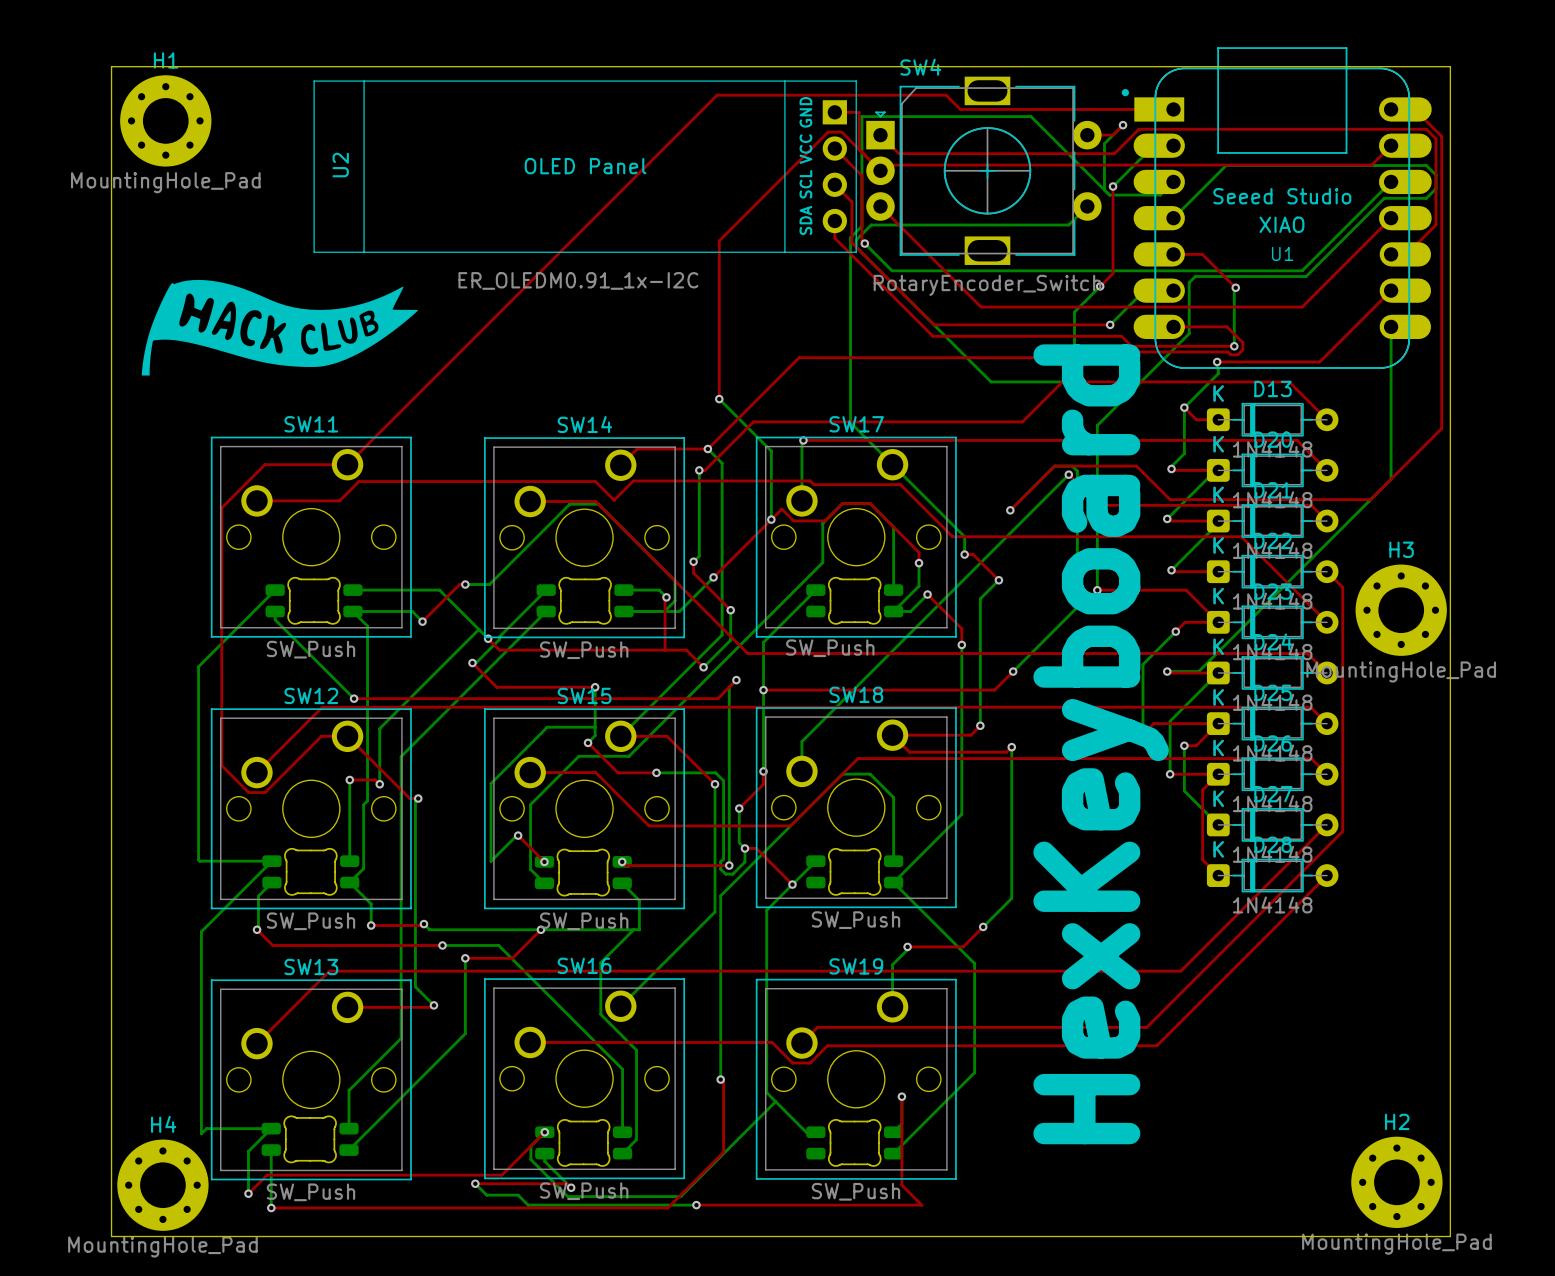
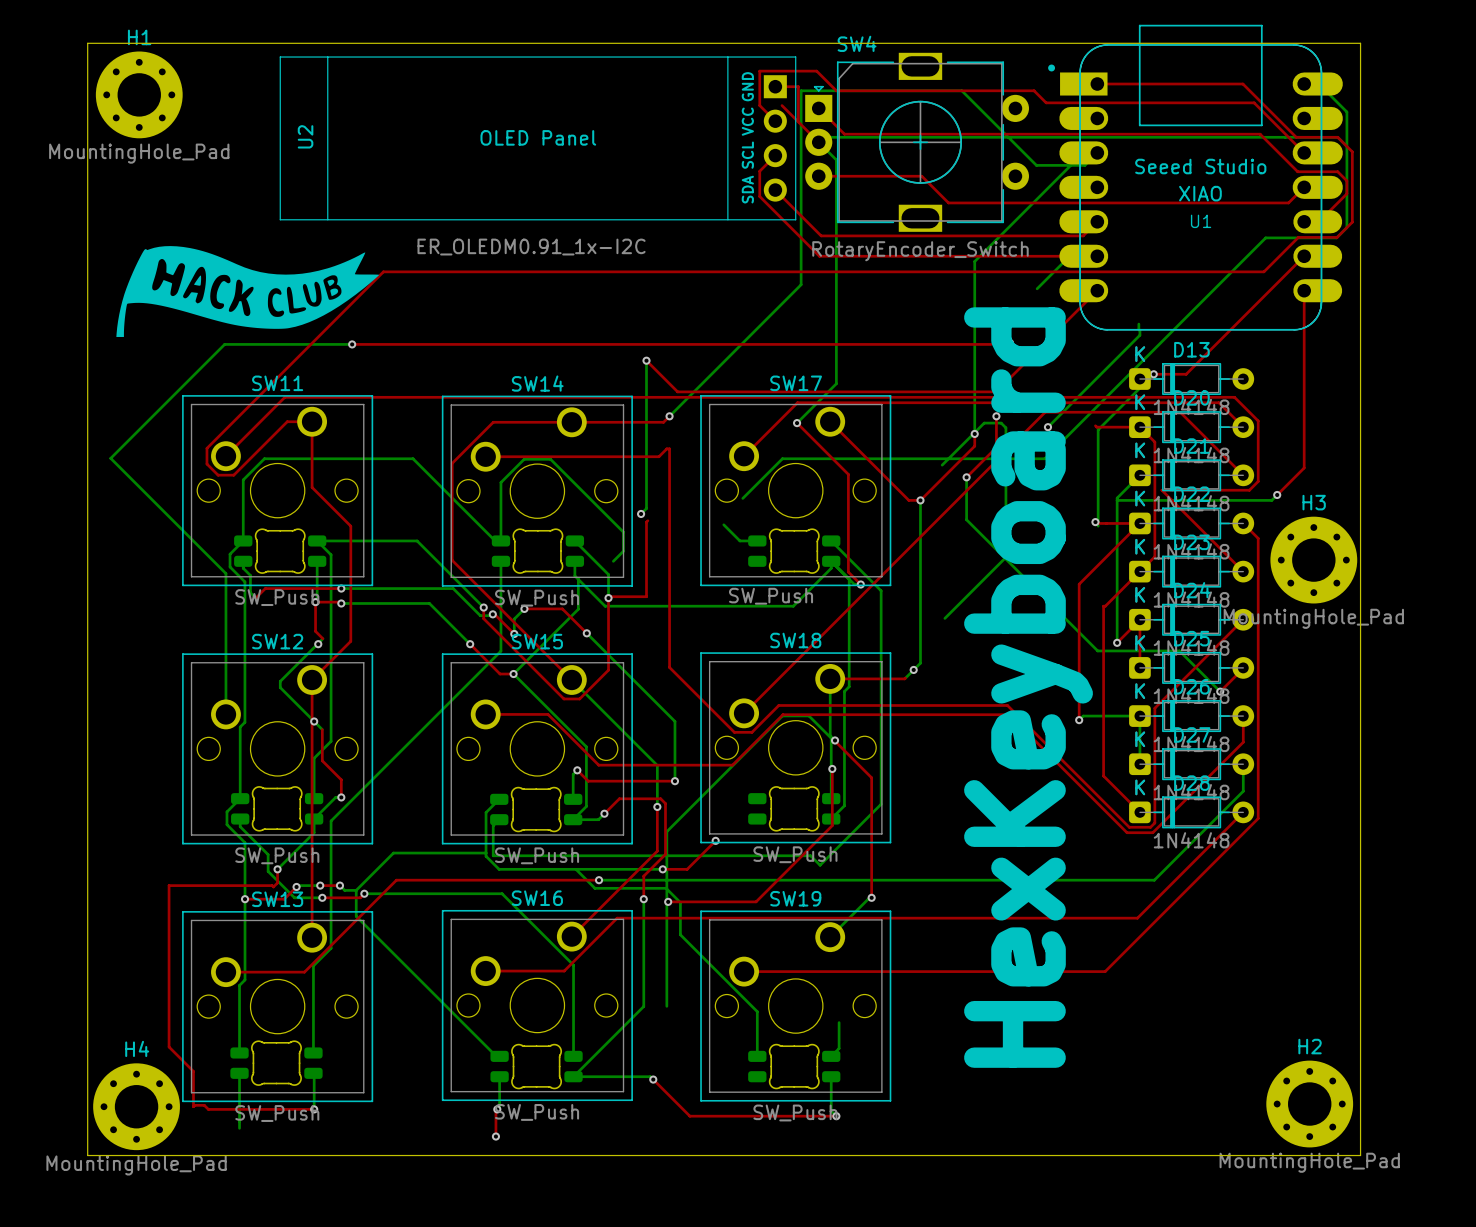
top track: (1173, 109) (960, 109) (946, 95) (717, 95) (347, 464) -> none
top track: (1391, 109) (1414, 109) (1441, 136) (1441, 180) -> (1097, 84) (1242, 84) (1296, 137) (1337, 137) (1352, 151)
bottom track: none -> (1304, 84) (1318, 84) (1346, 111) (1346, 146)
top track: (1123, 125) (1113, 135) (1087, 135) -> none
bottom track: (1123, 125) (1104, 143) (1104, 190) -> none
via: (1123, 125) -> none
top track: (1138, 129) (1114, 153) (899, 153) -> (1064, 102) (1046, 102) (1034, 90) (836, 90) (816, 71) (759, 71) (759, 105) (775, 121)
top track: (1338, 129) (1426, 129) (1436, 138) (1436, 211) -> (1254, 102) (1304, 152)
top track: (841, 132) (828, 132) (719, 240) (719, 399) -> none
bottom track: (1153, 145) (1113, 186) -> none
top track: (1391, 145) (1371, 165) (886, 165) (880, 170) -> none
top track: (834, 148) (861, 175) (861, 240) (864, 243) -> none
top track: none -> (836, 126) (844, 134) (1260, 134) (1297, 171) (1337, 171) (1346, 180)
bottom track: (1226, 165) (1173, 218) -> (1147, 137) (823, 137) (818, 142) (836, 159) (836, 383) (797, 423)
bottom track: none -> (1097, 152) (1083, 152) (974, 261) (974, 433)
bottom track: (1391, 181) (1302, 270) (892, 270) (864, 243) -> none
top track: (834, 184) (851, 201) (851, 242) (934, 324) (1110, 324) -> (775, 155) (759, 171) (759, 196) (819, 256) (1097, 256)
top track: (1113, 186) (1113, 273) (1100, 286) -> none
via: (1113, 186) -> none
bottom track: (1436, 188) (1426, 198) (1384, 198) (1306, 276) (1195, 276) (1189, 282) (1189, 333) (1097, 425) (1097, 590) -> (1346, 159) (1346, 227) (1336, 237) (1265, 237) (1044, 458) (808, 458)
top track: (880, 206) (981, 307) -> (818, 176) (921, 176) (948, 202) (1288, 202)
bottom track: (1087, 206) (1068, 225) (871, 225) (856, 240) (856, 247) (991, 381) (1081, 381) -> none
top track: (834, 221) (834, 238) (932, 336) (1121, 336) (1131, 346) (1234, 346) -> (775, 190) (821, 235) (1083, 235) (1097, 221)
bottom track: (861, 226) (850, 237) (850, 422) (964, 536) (964, 554) -> (801, 195) (801, 284) (669, 416)
top track: (1374, 234) (1302, 307) -> (1352, 222) (1337, 237) (1298, 237) (1263, 271) (1219, 271)
via: (864, 243) -> none
top track: (1173, 254) (1202, 254) (1235, 287) -> none
top track: (1441, 254) (1441, 428) (1370, 499) (1170, 499) (1136, 466) (1054, 466) (1010, 510) -> none
bottom track: (1100, 286) (1074, 312) (1074, 357) -> none
via: (1100, 286) -> none
bottom track: (1235, 287) (1234, 346) -> none
via: (1235, 287) -> none
top track: none -> (914, 271) (383, 271) (233, 421)
via: (1110, 324) -> none
top track: (1173, 326) (1227, 326) (1242, 342) (1242, 349) (1237, 354) (1230, 354) (1227, 351) (1092, 351) (1022, 421) (753, 421) (705, 470) (699, 470) -> (1097, 290) (996, 391) (677, 391) (646, 360)
top track: none -> (1304, 290) (1304, 467) (1277, 494)
bottom track: (1391, 326) (1391, 479) (1198, 671) (1167, 671) -> none
via: (1234, 346) -> none
top track: (1074, 357) (799, 357) (707, 449) (637, 449) (620, 465) -> none
top track: (1217, 361) (1319, 361) -> (1153, 374) (1186, 374) (1236, 324)
via: (1217, 361) -> none
top track: (1081, 381) (1289, 381) (1327, 419) -> none
top track: none -> (352, 344) (991, 344)
bottom track: none -> (352, 344) (224, 344) (110, 458) (225, 573) (225, 714)
via: none -> (352, 344)
bottom track: (719, 399) (771, 451) (771, 519) -> none
via position: (719, 399) -> (646, 360)
bottom track: none -> (646, 360) (646, 427)
top track: (1184, 407) (1196, 419) (1218, 419) -> none
bottom track: (1184, 407) (1184, 453) (1171, 466) (1171, 468) -> (1107, 367) (1047, 427)
via: (1184, 407) -> none
bottom track: none -> (1153, 374) (1098, 429) (1098, 526)
via: none -> (1153, 374)
top track: (803, 440) (1297, 440) (1301, 444) -> (744, 456) (797, 402) (1218, 402)
bottom track: (803, 440) (801, 500) -> none
via: (803, 440) -> none
bottom track: (707, 449) (722, 463) (722, 634) (620, 736) -> (657, 806) (657, 765) (571, 679)
via: (707, 449) -> none
via: none -> (669, 416)
top track: none -> (996, 416) (996, 447) (966, 477)
via: none -> (996, 416)
top track: (264, 464) (321, 464) -> (206, 448) (206, 464) (218, 475) (233, 475) (287, 421)
top track: none -> (830, 421) (908, 500) (920, 500) (974, 446) (974, 433)
top track: none -> (797, 423) (848, 474) (848, 572) (860, 584)
via: none -> (797, 423)
via: (1171, 468) -> none
via: (699, 470) -> none
via: none -> (1047, 427)
bottom track: (1218, 470) (1215, 470) (1167, 518) -> none
top track: (1068, 474) (1099, 505) (1311, 505) -> (744, 713) (1045, 412) (1180, 412) (1228, 460)
bottom track: (1068, 474) (801, 741) (801, 771) -> none
via: (1068, 474) -> none
via: none -> (974, 433)
top track: (237, 492) (221, 507) (221, 765) (248, 792) (265, 792) (321, 736) (347, 736) (409, 798) (418, 798) -> none
top track: (256, 500) (339, 500) (358, 481) (595, 481) (614, 500) (633, 480) (810, 480) (813, 484) (900, 484) (952, 536) (1241, 536) -> (225, 456) (284, 397) (1234, 397) (1258, 420) (1258, 481) (1249, 490) (1161, 490)
top track: (595, 501) (747, 653) (1307, 653) (1327, 672) -> (548, 456) (658, 456) (666, 448) (669, 448) (669, 667) (734, 732) (751, 732) (778, 705) (1007, 705) (1129, 827) (1150, 827) (1154, 823) (1154, 708) (1243, 619)
bottom track: (870, 503) (893, 527) (893, 590) -> none
bottom track: (570, 504) (489, 584) (465, 584) -> (524, 459) (500, 482) (500, 540) (495, 540) (413, 458) (264, 458) (243, 479) (243, 540)
top track: (781, 509) (713, 577) -> none
top track: (781, 509) (793, 520) (825, 520) (842, 503) (870, 503) (919, 552) (919, 563) -> none
via: (1010, 510) -> none
top track: (1167, 518) (1169, 521) (1218, 521) -> none
via: (1167, 518) -> none
via: (771, 519) -> none
bottom track: (1218, 521) (1218, 523) (1171, 570) -> (1139, 475) (1117, 498) (1117, 642)
bottom track: (822, 523) (822, 562) (629, 756) (578, 756) (530, 804) (530, 869) (544, 883) -> (831, 540) (881, 590) (881, 804) (820, 865) (810, 855) (493, 855) (493, 825) (499, 819)
bottom track: none -> (966, 477) (966, 519) (1097, 650) (1179, 650) (1220, 691)
via: none -> (966, 477)
bottom track: none -> (1277, 494) (1271, 500) (1117, 500)
via: none -> (1277, 494)
bottom track: none -> (920, 500) (920, 663) (905, 678)
via: none -> (920, 500)
top track: (964, 554) (973, 554) (998, 580) -> none
via: (964, 554) -> none
top track: (693, 561) (693, 573) (730, 610) -> none
bottom track: (919, 563) (919, 586) (893, 611) (910, 611) (927, 594) -> none
via: (919, 563) -> none
top track: none -> (647, 520) (646, 596) (608, 598) (608, 670) (579, 698) (563, 698) (483, 618) (483, 607)
top track: none -> (1139, 523) (1079, 584) (1079, 720)
bottom track: (713, 577) (679, 611) (623, 611) -> (578, 579) (574, 575) (574, 561)
via: (713, 577) -> none
bottom track: (998, 580) (980, 598) (980, 725) -> none
via: (998, 580) -> none
top track: (465, 584) (459, 584) (422, 621) -> none
via: (465, 584) -> none
bottom track: (439, 590) (488, 638) -> (399, 540) (417, 540) (483, 607)
bottom track: (546, 590) (476, 663) (472, 663) -> none
bottom track: (623, 590) (659, 590) (666, 597) -> (574, 540) (608, 574) (608, 598)
bottom track: (815, 590) (763, 642) (763, 771) -> (757, 540) (739, 540) (723, 524)
top track: (1097, 590) (1186, 590) (1218, 622) (1185, 622) (1175, 631) -> none
via: (1097, 590) -> none
top track: (927, 594) (961, 628) (961, 644) -> none
via: (927, 594) -> none
top track: (666, 597) (665, 650) -> none
via: (666, 597) -> none
bottom track: (261, 604) (198, 666) (198, 859) (271, 861) -> (230, 554) (230, 567) (244, 581) (244, 722) (240, 727) (240, 798)
bottom track: (730, 610) (730, 640) (703, 667) -> none
via: (730, 610) -> none
bottom track: none -> (317, 561) (317, 600) (315, 602)
bottom track: (546, 611) (401, 756) (401, 1038) (349, 1090) -> (500, 561) (500, 651) (331, 820) (331, 948) (313, 965) (313, 1016)
bottom track: (275, 618) (354, 698) -> (243, 568) (250, 575) (250, 592) (255, 598)
bottom track: (422, 621) (412, 611) (352, 611) (367, 626) -> (317, 540) (331, 554) (331, 575)
via: (422, 621) -> none
bottom track: (478, 629) (379, 728) (379, 784) -> none
bottom track: none -> (578, 579) (605, 606) (793, 606) (831, 568) (831, 561) (854, 584) (860, 584)
bottom track: none -> (578, 579) (578, 609) (513, 674) (586, 746) (586, 806) (573, 819) (598, 819) (604, 813)
bottom track: (1175, 631) (1143, 664) (1143, 734) -> none
via: (1175, 631) -> none
via: none -> (860, 584)
top track: (488, 638) (499, 650) (686, 650) (703, 667) -> none
via: (488, 638) -> none
top track: none -> (341, 588) (265, 588) (255, 598)
bottom track: none -> (341, 588) (453, 588) (480, 615) (492, 614)
via: none -> (341, 588)
bottom track: (961, 644) (961, 814) (907, 868) -> (849, 579) (849, 686) (844, 691) (844, 805)
via: (961, 644) -> none
via: none -> (608, 598)
via: none -> (315, 602)
top track: none -> (341, 603) (315, 602) (315, 631) (322, 638)
bottom track: none -> (341, 603) (429, 603) (470, 644)
via: none -> (341, 603)
via: none -> (483, 607)
top track: none -> (524, 608) (562, 608) (586, 633)
bottom track: none -> (524, 608) (514, 619) (514, 633)
via: none -> (524, 608)
top track: (472, 663) (496, 687) (595, 687) -> none
via: (472, 663) -> none
top track: none -> (492, 614) (514, 633)
via: none -> (492, 614)
via: (703, 667) -> none
top track: (1013, 671) (994, 690) (763, 690) -> none
via: (1013, 671) -> none
top track: (1167, 671) (1218, 672) -> (1117, 642) (1139, 620)
via: (1167, 671) -> none
top track: none -> (1139, 619) (1139, 667)
bottom track: (1218, 672) (1170, 721) (1170, 774) -> none
top track: (736, 680) (717, 698) (354, 698) -> none
bottom track: (736, 680) (729, 687) (729, 779) -> (586, 633) (674, 721)
via: (736, 680) -> none
via: none -> (514, 633)
bottom track: (595, 687) (595, 735) (588, 742) -> none
via: (595, 687) -> none
via: none -> (586, 633)
via: (763, 690) -> none
bottom track: none -> (322, 638) (280, 681) (280, 687) (322, 729)
via: none -> (1117, 642)
top track: none -> (470, 644) (500, 674) (513, 674)
via: none -> (470, 644)
top track: (1327, 723) (1310, 707) (322, 707) (256, 772) -> (1243, 667) (1220, 691)
top track: (980, 725) (971, 734) -> none
bottom track: (595, 727) (547, 727) (491, 783) (491, 861) (518, 835) -> none
via: none -> (513, 674)
top track: (1143, 734) (1153, 723) (1218, 723) (1196, 745) (1184, 745) -> none
top track: (892, 735) (909, 752) (1006, 752) (1011, 747) -> none
bottom track: none -> (830, 678) (830, 735) (835, 740)
top track: (620, 736) (667, 736) (715, 784) -> (571, 679) (452, 560) (452, 463) (493, 422) (663, 422) (669, 416)
top track: (588, 742) (617, 772) (656, 772) -> none
via: (588, 742) -> none
bottom track: (1184, 745) (1184, 790) (1218, 824) -> (1079, 720) (1083, 716) (1139, 716) (1139, 764)
via: (1184, 745) -> none
bottom track: (1011, 747) (1011, 898) (983, 926) -> none
via: (1011, 747) -> none
via: none -> (1220, 691)
top track: (763, 771) (763, 784) (739, 808) -> none
via: (763, 771) -> none
bottom track: (656, 772) (715, 772) (723, 780) (723, 859) (720, 862) (720, 869) (725, 874) (732, 874) (744, 861) (744, 848) (739, 842) (739, 808) -> none
via: (656, 772) -> none
top track: (1170, 774) (1218, 774) (1202, 789) (1202, 859) -> (1139, 427) (1154, 442) (1154, 556) (1103, 606) (1103, 776) (1125, 797)
via position: (1170, 774) -> (1079, 720)
top track: (1327, 774) (1311, 758) (857, 758) (789, 825) -> (1243, 716) (1243, 742) (1152, 832) (1127, 832) (1009, 714) (782, 714) (732, 765)
top track: (349, 779) (375, 779) (379, 784) -> none
bottom track: (349, 780) (349, 818) -> (327, 745) (314, 758)
via: (379, 784) -> none
bottom track: (715, 784) (715, 912) (620, 1006) -> none
via: (715, 784) -> none
top track: none -> (322, 729) (322, 760) (341, 779) (341, 797)
bottom track: (418, 798) (415, 801) (415, 986) (433, 1005) -> none
via: (418, 798) -> none
top track: none -> (835, 740) (871, 777) (871, 897)
via: none -> (835, 740)
bottom track: (363, 804) (363, 868) -> (341, 797) (335, 797) (327, 805)
via: (739, 808) -> none
top track: (1327, 824) (1180, 971) (329, 971) (256, 1043) -> (599, 880) (396, 880) (304, 972) (225, 972)
bottom track: none -> (1243, 764) (1243, 791) (1154, 880) (599, 880)
top track: none -> (832, 768) (832, 825) (756, 901) (668, 901)
via: none -> (832, 768)
top track: none -> (577, 770) (588, 781) (674, 781)
bottom track: none -> (577, 770) (573, 774) (573, 799)
via: none -> (577, 770)
top track: (1342, 831) (1146, 1027) (817, 1027) (801, 1043) -> (1258, 770) (1258, 818) (1105, 971) (744, 971)
top track: (518, 835) (544, 861) -> none
via: (518, 835) -> none
bottom track: (729, 842) (729, 865) -> none
via: none -> (674, 781)
top track: (744, 848) (756, 848) (792, 884) -> none
via: (744, 848) -> none
via: none -> (341, 797)
bottom track: none -> (499, 799) (486, 812) (486, 856) (499, 869) (662, 869)
via: (544, 861) -> none
top track: (622, 861) (625, 865) (729, 865) -> none
via: (622, 861) -> none
bottom track: (815, 861) (766, 910) (766, 1092) (806, 1132) (815, 1132) -> (575, 869) (594, 888) (666, 888) (680, 902) (680, 934) (757, 1011) (757, 1056)
via: (729, 865) -> none
top track: none -> (657, 806) (657, 851) (571, 936)
via: none -> (657, 806)
bottom track: (258, 875) (201, 931) (201, 1133) (206, 1128) (271, 1128) (248, 1151) (248, 1193) -> (226, 811) (226, 824) (245, 842) (245, 979) (239, 985) (239, 1052)
top track: none -> (604, 813) (619, 798) (660, 798) (665, 803) (665, 854) (643, 876) (643, 899)
via: none -> (604, 813)
bottom track: (271, 882) (258, 896) (257, 929) -> (240, 819) (240, 826) (268, 854) (268, 871) (294, 897) (322, 897)
bottom track: (349, 882) (371, 904) (371, 925) -> (314, 819) (314, 832) (277, 869)
bottom track: (893, 882) (974, 963) (974, 1072) (893, 1153) -> (836, 1116) (831, 1111) (831, 1076)
bottom track: (622, 883) (639, 900) (639, 929) (429, 929) (423, 924) -> none
via: (792, 884) -> none
top track: none -> (715, 840) (687, 869) (662, 869)
via: none -> (715, 840)
bottom track: none -> (486, 853) (393, 853) (356, 890)
top track: (423, 924) (371, 925) -> none
via: (423, 924) -> none
via: (371, 925) -> none
top track: (983, 926) (963, 946) (907, 946) -> none
via: (983, 926) -> none
top track: (257, 929) (272, 945) (442, 945) -> none
via: (257, 929) -> none
top track: (540, 929) (512, 958) (465, 958) -> none
via: (540, 929) -> none
bottom track: (633, 929) (600, 962) (600, 1014) -> (364, 893) (502, 893) (552, 944)
top track: none -> (277, 869) (277, 882) (273, 886) (169, 885) (169, 1047) (193, 1071) (193, 1106) (204, 1105) (208, 1109) (314, 1109)
via: none -> (277, 869)
via: none -> (662, 869)
bottom track: (442, 945) (498, 945) (622, 1069) -> none
via: (442, 945) -> none
via: none -> (599, 880)
bottom track: (907, 946) (907, 949) (892, 964) (892, 1006) -> (871, 897) (830, 937)
via: (907, 946) -> none
top track: none -> (320, 885) (339, 885)
bottom track: none -> (320, 885) (296, 886)
via: none -> (320, 885)
bottom track: none -> (339, 885) (344, 890) (356, 890)
via: none -> (339, 885)
top track: none -> (296, 886) (284, 899) (245, 899)
via: none -> (296, 886)
bottom track: (465, 958) (465, 1033) (349, 1150) -> (314, 1109) (313, 1073)
via: (465, 958) -> none
top track: none -> (364, 893) (360, 897) (322, 897)
via: none -> (364, 893)
via: none -> (322, 897)
via: none -> (871, 897)
via: none -> (245, 899)
bottom track: none -> (643, 899) (643, 1006) (586, 1063)
via: none -> (643, 899)
via: none -> (668, 901)
top track: (1215, 986) (1156, 1045) (827, 1045) (810, 1063) (792, 1063) (772, 1042) (612, 1042) -> (1137, 918) (617, 918) (564, 971)
top track: (433, 1005) (431, 1007) (347, 1007) -> (312, 421) (312, 487) (350, 526) (350, 641) (312, 679) (312, 937)
via: (433, 1005) -> none
bottom track: (622, 1036) (636, 1050) (636, 1139) -> (573, 965) (573, 996)
top track: (720, 1079) (723, 1082) (723, 1152) (667, 1207) (271, 1207) -> none
via: (720, 1079) -> none
top track: (901, 1096) (901, 1185) (921, 1205) (696, 1205) -> none
via: (901, 1096) -> none
bottom track: (775, 1101) (680, 1196) (567, 1196) (530, 1159) (530, 1146) (544, 1132) -> (356, 890) (356, 916) (496, 1056) (499, 1056)
top track: (544, 1132) (501, 1175) (267, 1175) (248, 1193) -> none
via: (544, 1132) -> none
bottom track: none -> (573, 1076) (650, 1076) (653, 1079)
top track: none -> (653, 1079) (689, 1116) (836, 1116)
via: none -> (653, 1079)
bottom track: (544, 1161) (571, 1187) -> (499, 1084) (499, 1107) (497, 1109)
top track: (475, 1183) (567, 1183) (571, 1187) -> none
bottom track: (475, 1183) (486, 1195) (518, 1195) (528, 1205) (696, 1205) -> none
via: (475, 1183) -> none
via: (571, 1187) -> none
via: none -> (314, 1109)
top track: none -> (497, 1109) (495, 1136)
via: none -> (497, 1109)
via: (248, 1193) -> none
via: none -> (836, 1116)
via: (696, 1205) -> none
via: (271, 1207) -> none
via: none -> (495, 1136)

